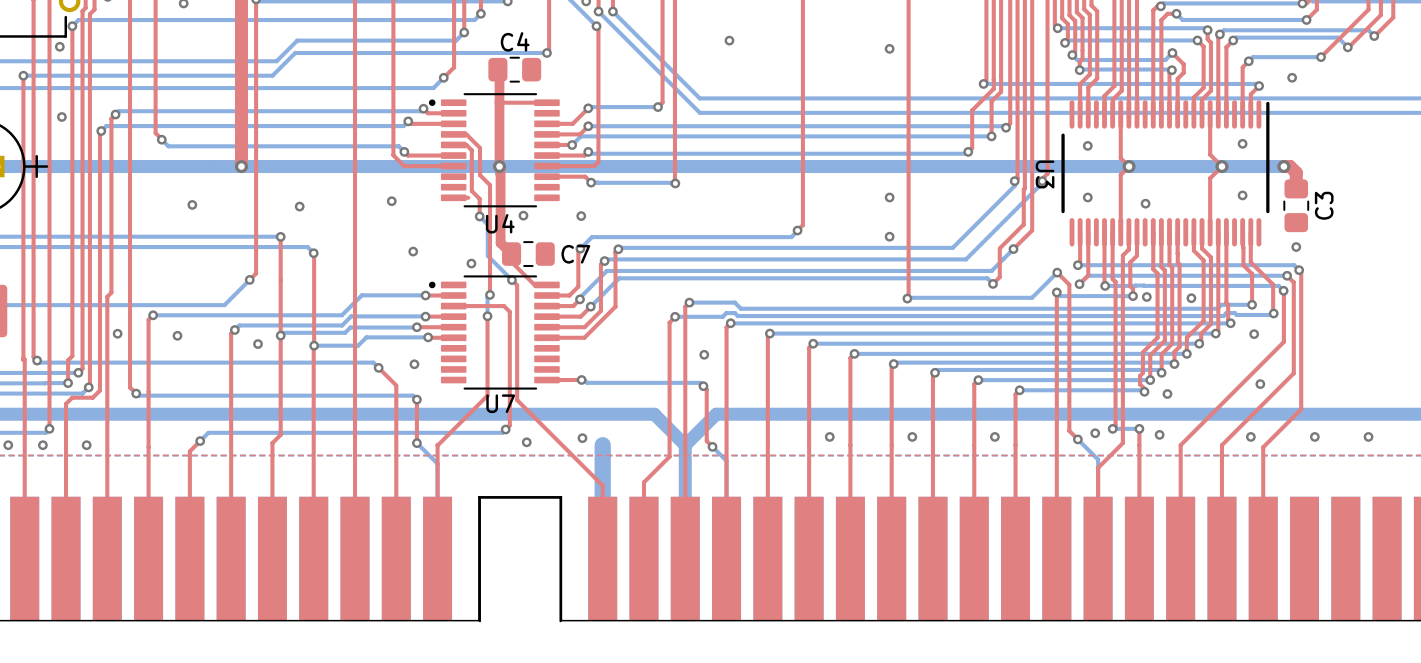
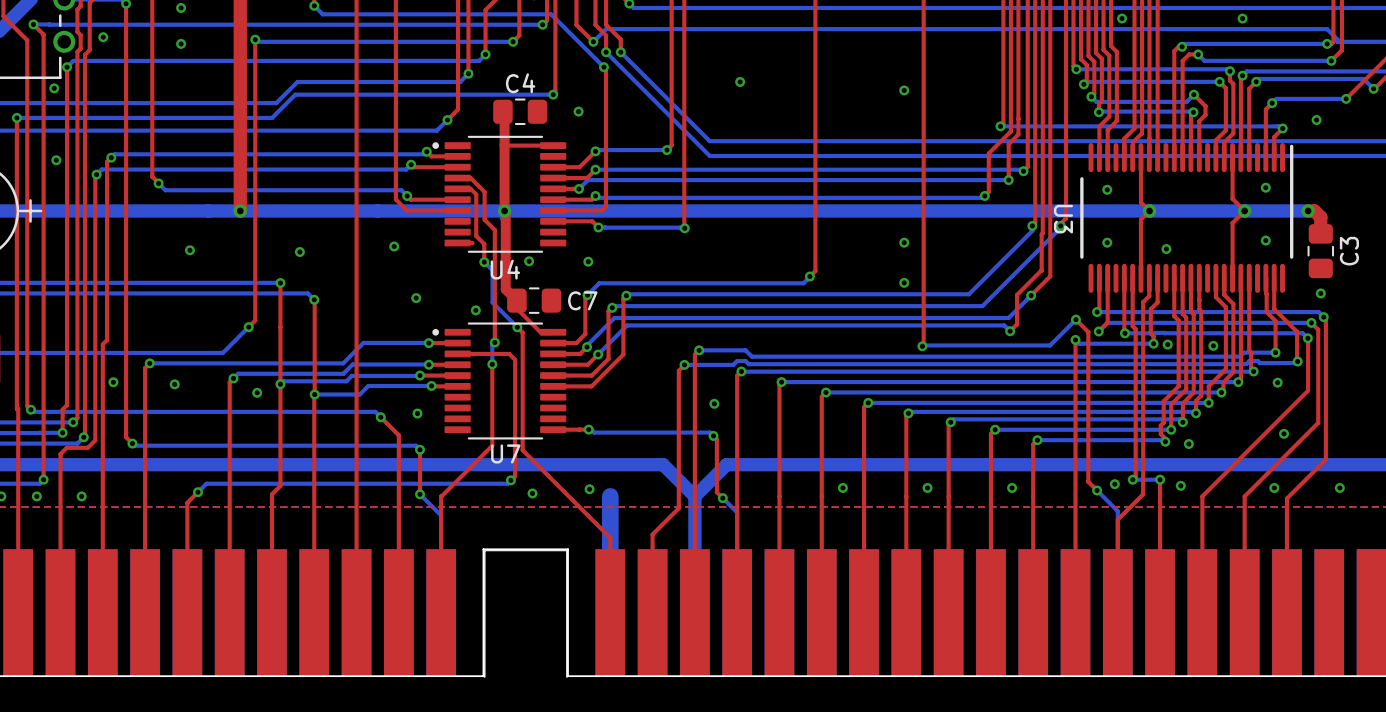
via: none -> (578, 111)

